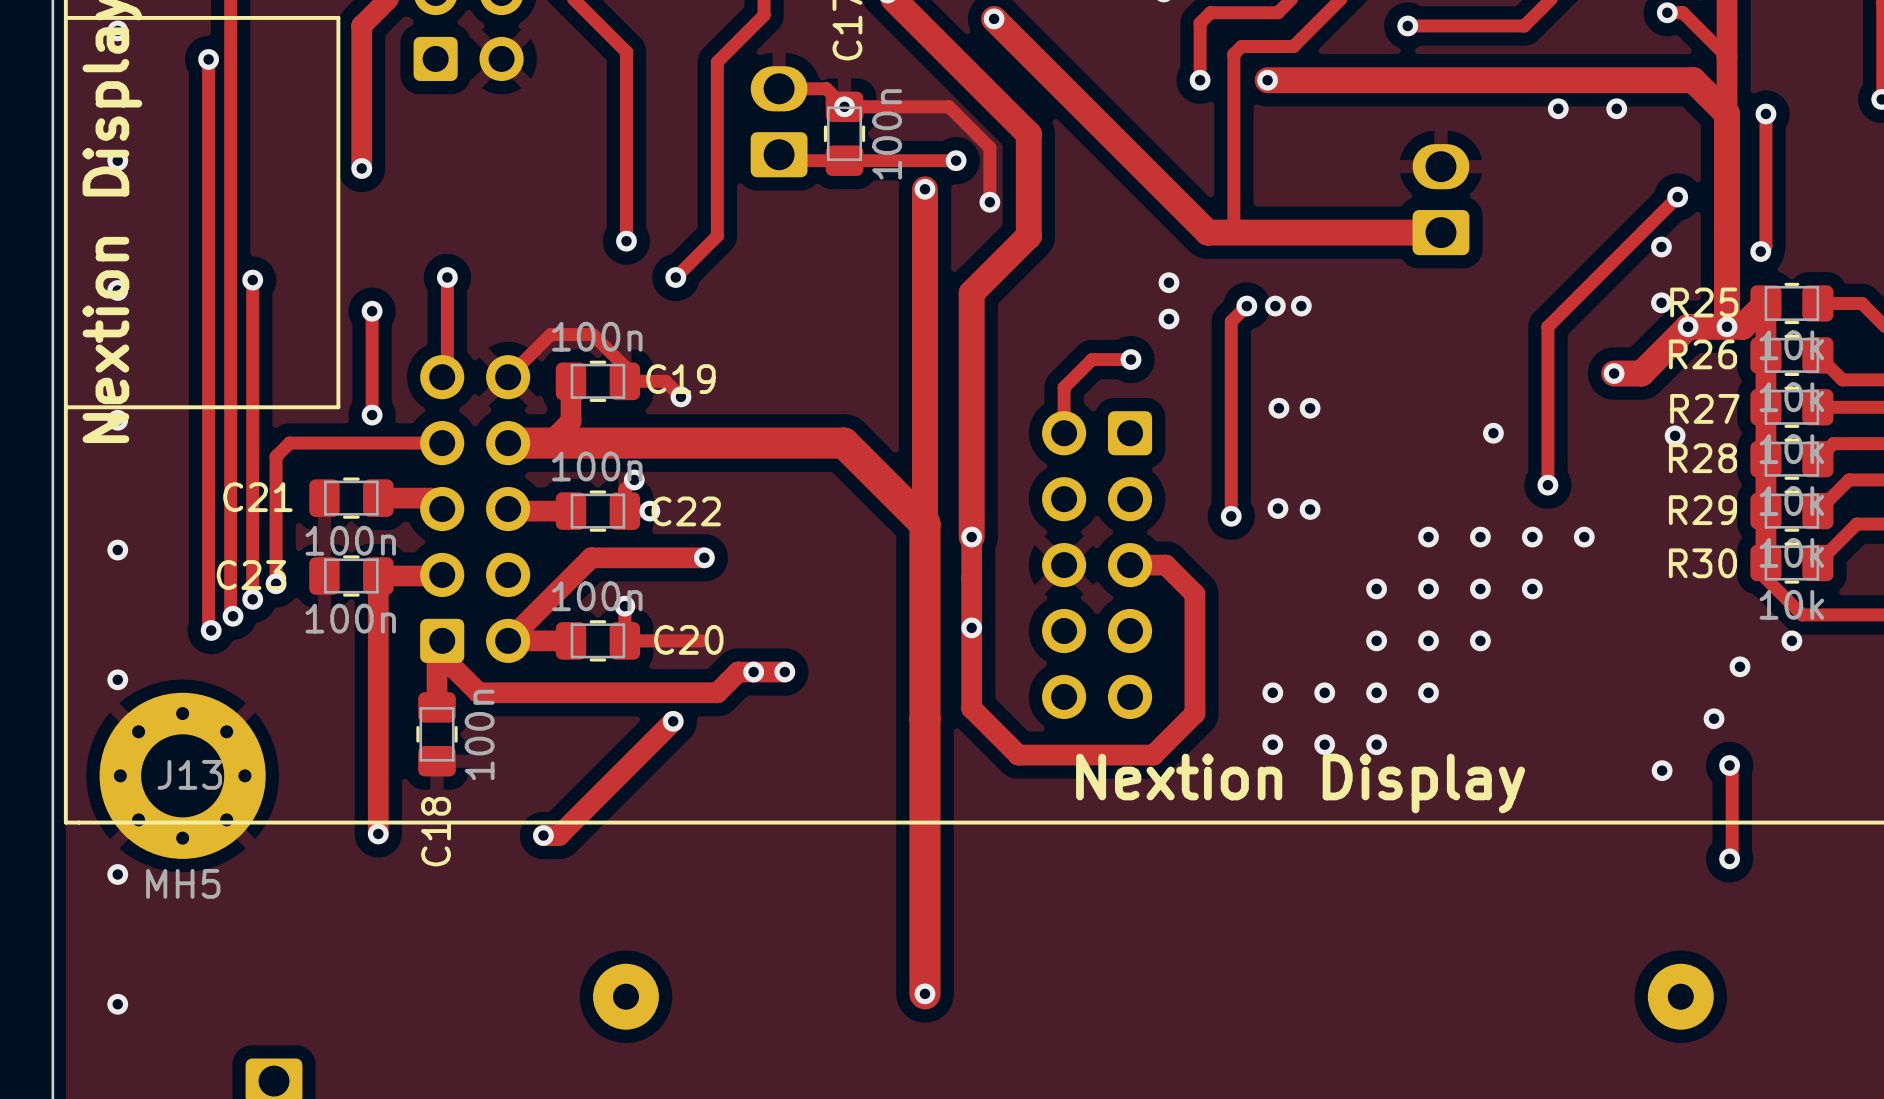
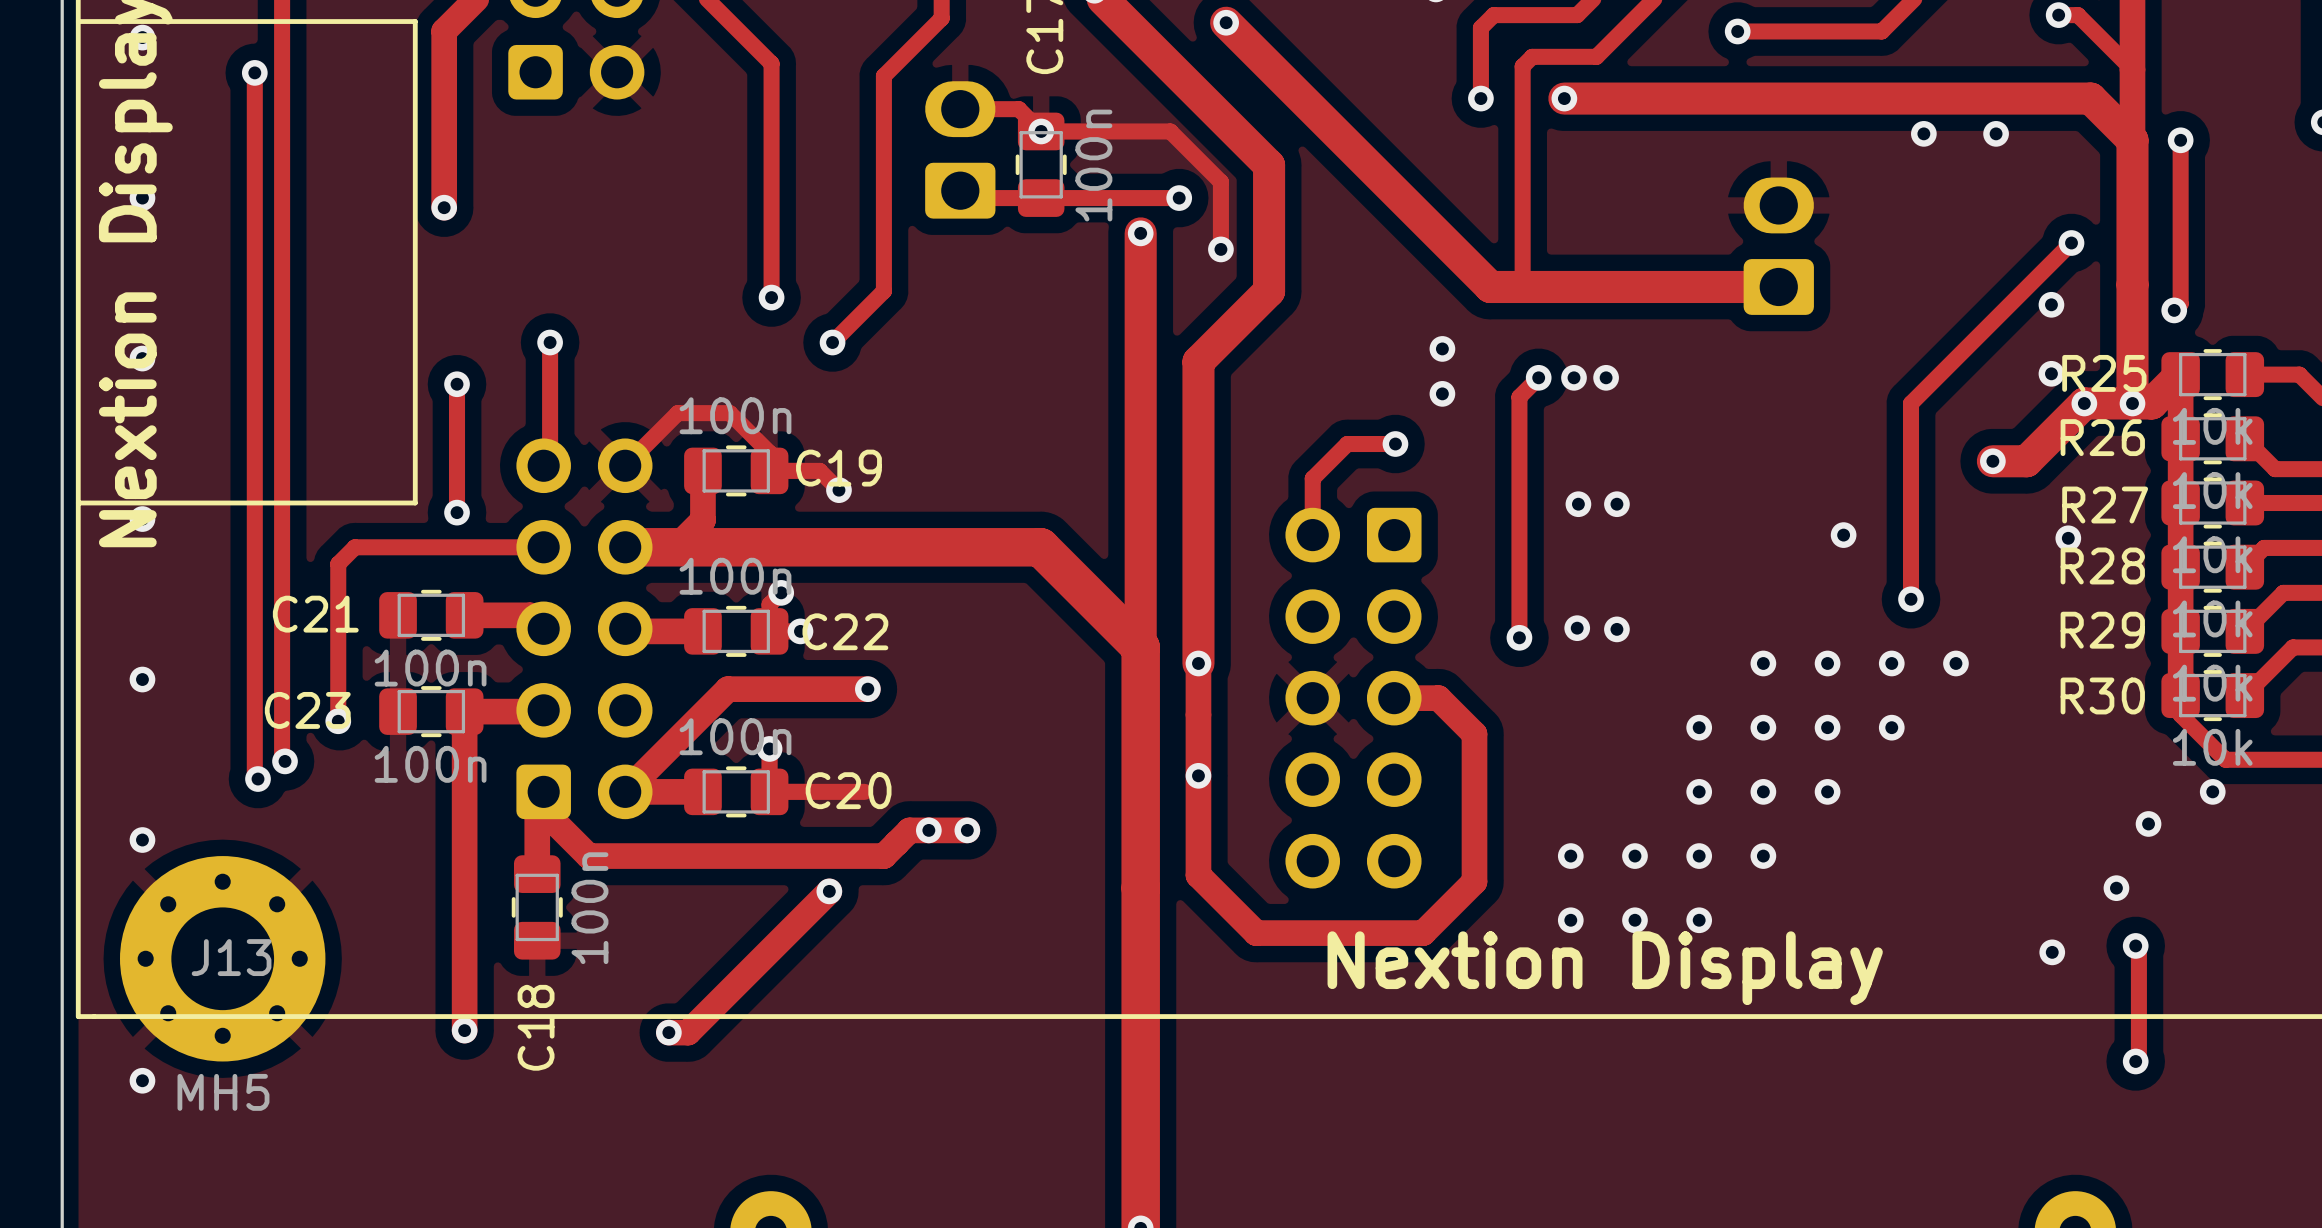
track: (252, 280) (252, 599) -> none
via: (252, 280) -> none
via: (252, 599) -> none

